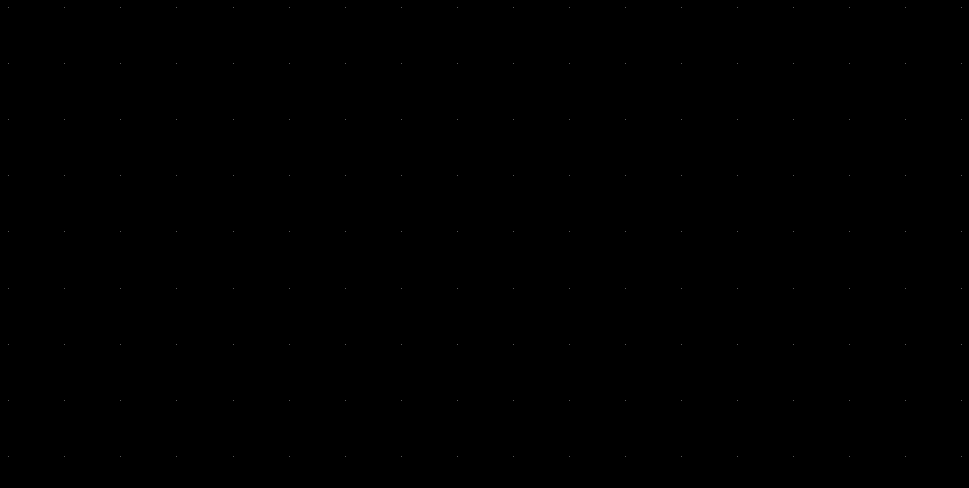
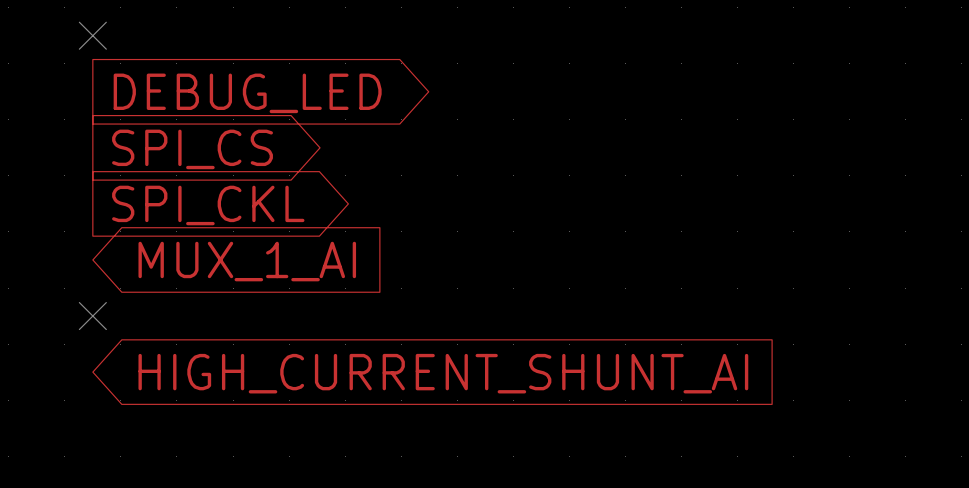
no-connect mark: none -> (92, 35)
global label: none -> DEBUG_LED (247, 93)
global label: none -> SPI_CS (192, 149)
global label: none -> SPI_CKL (208, 205)
global label: none -> MUX_1_AI (247, 261)
no-connect mark: none -> (92, 316)
global label: none -> HIGH_CURRENT_SHUNT_AI (443, 373)

